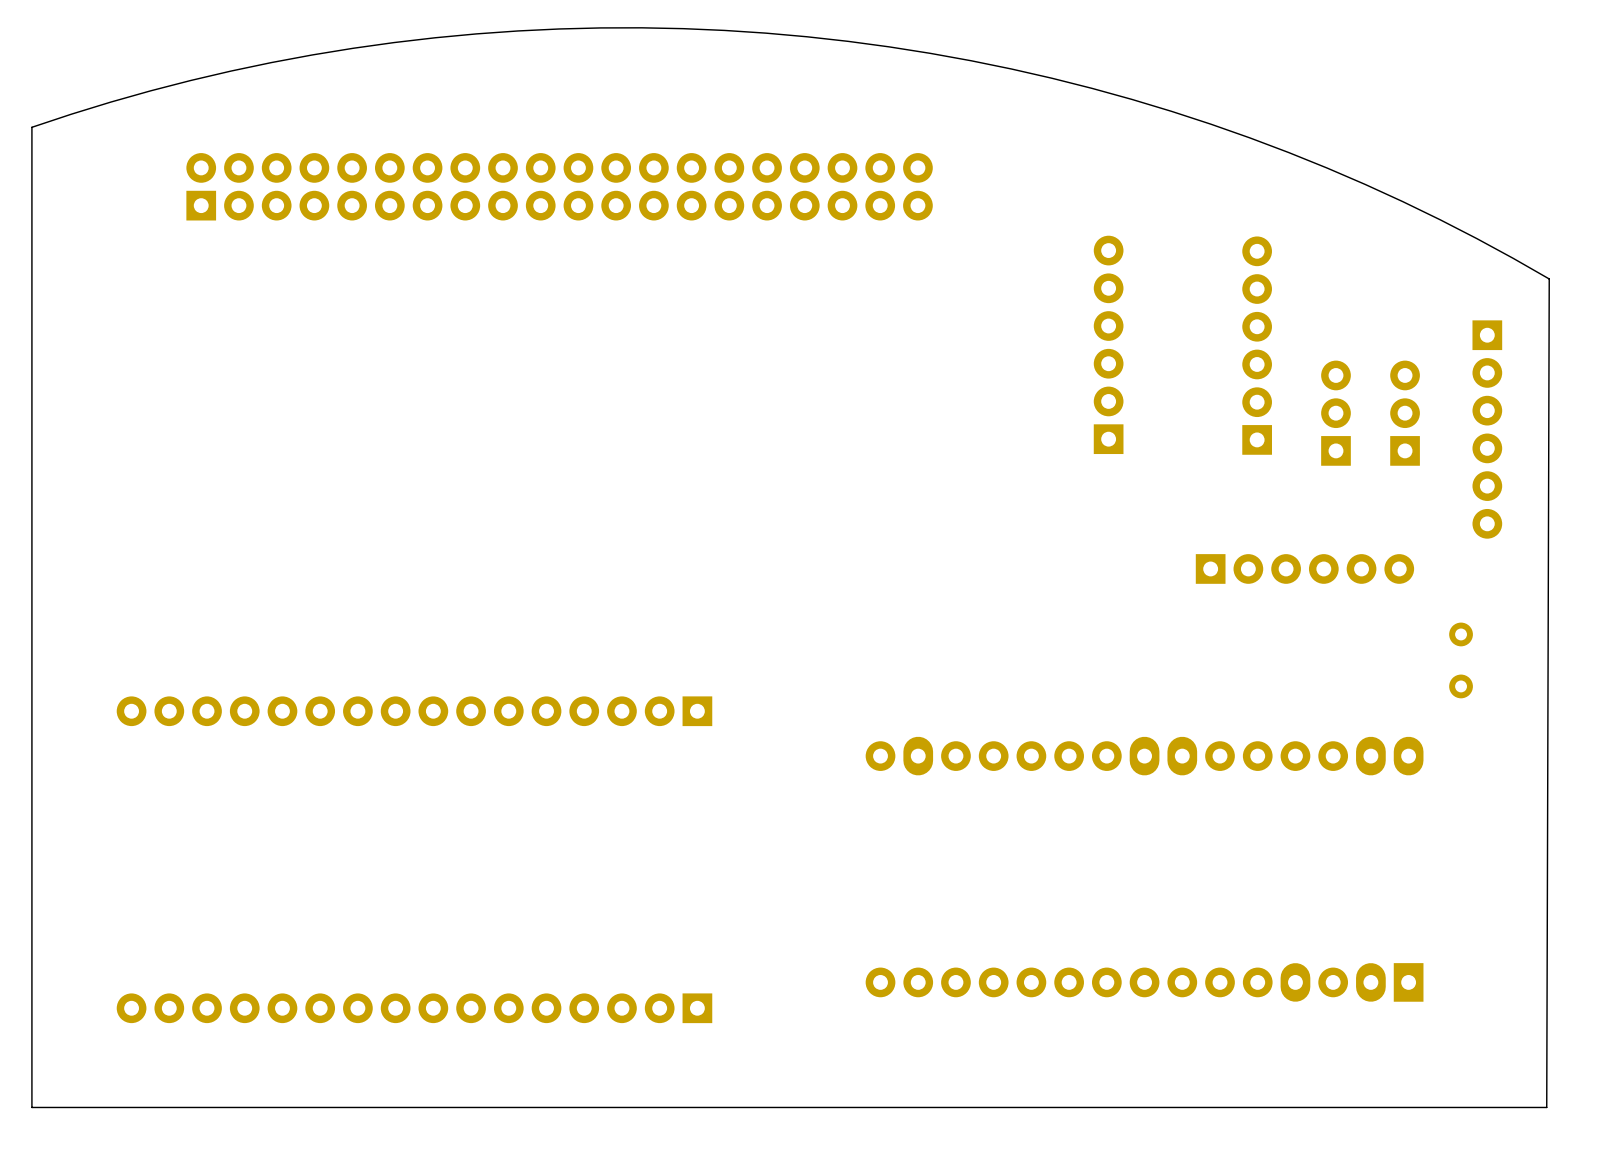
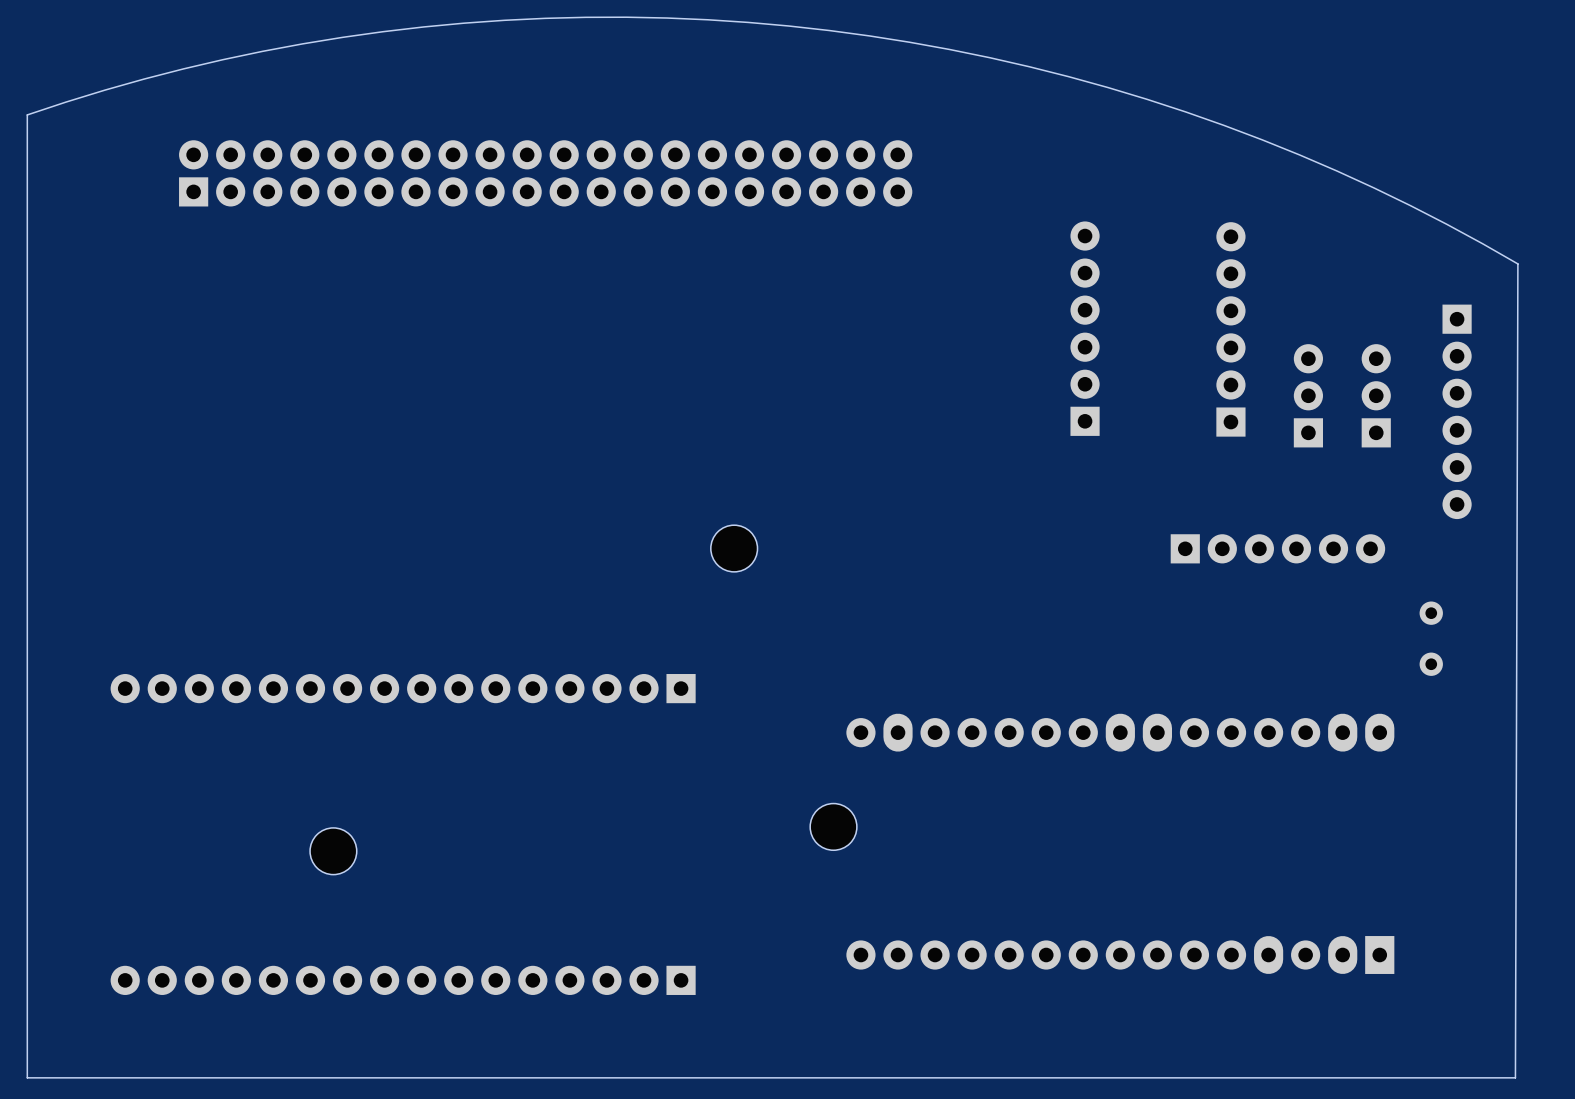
part: none -> (734, 548)
part: none -> (833, 826)
part: none -> (333, 851)

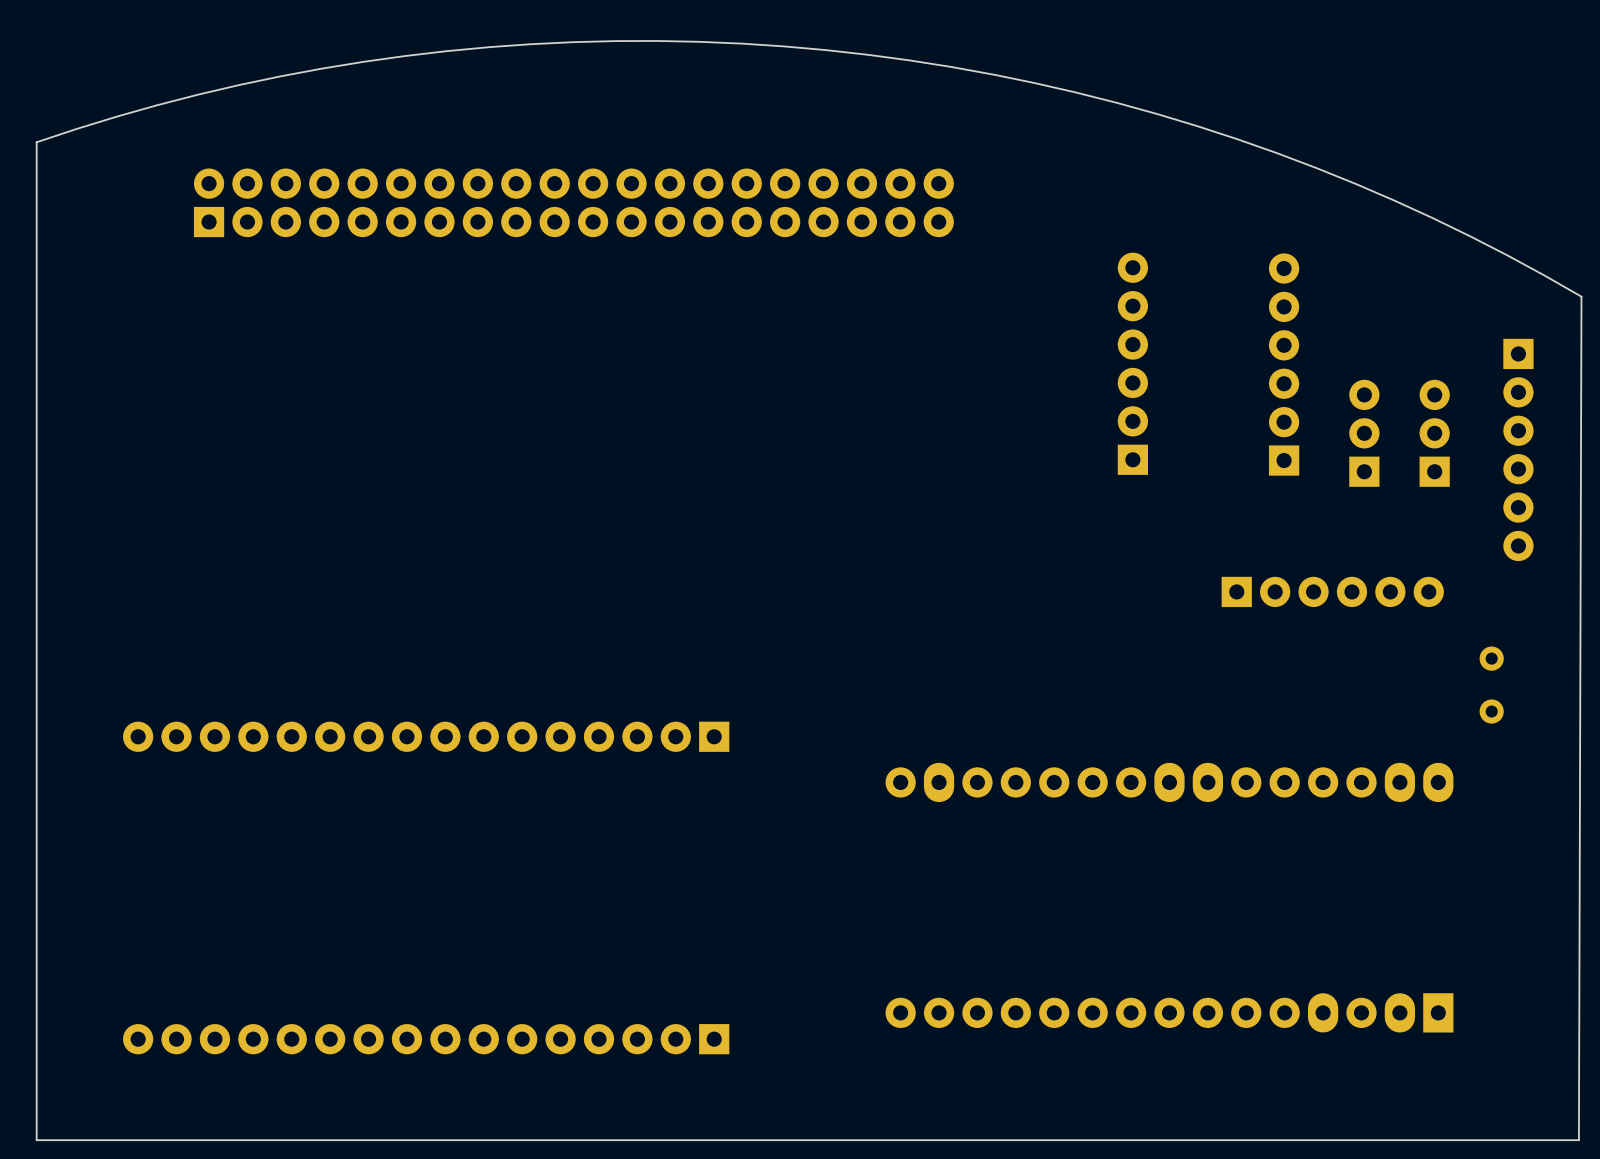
part: (734, 548) -> none
part: (833, 826) -> none
part: (333, 851) -> none

